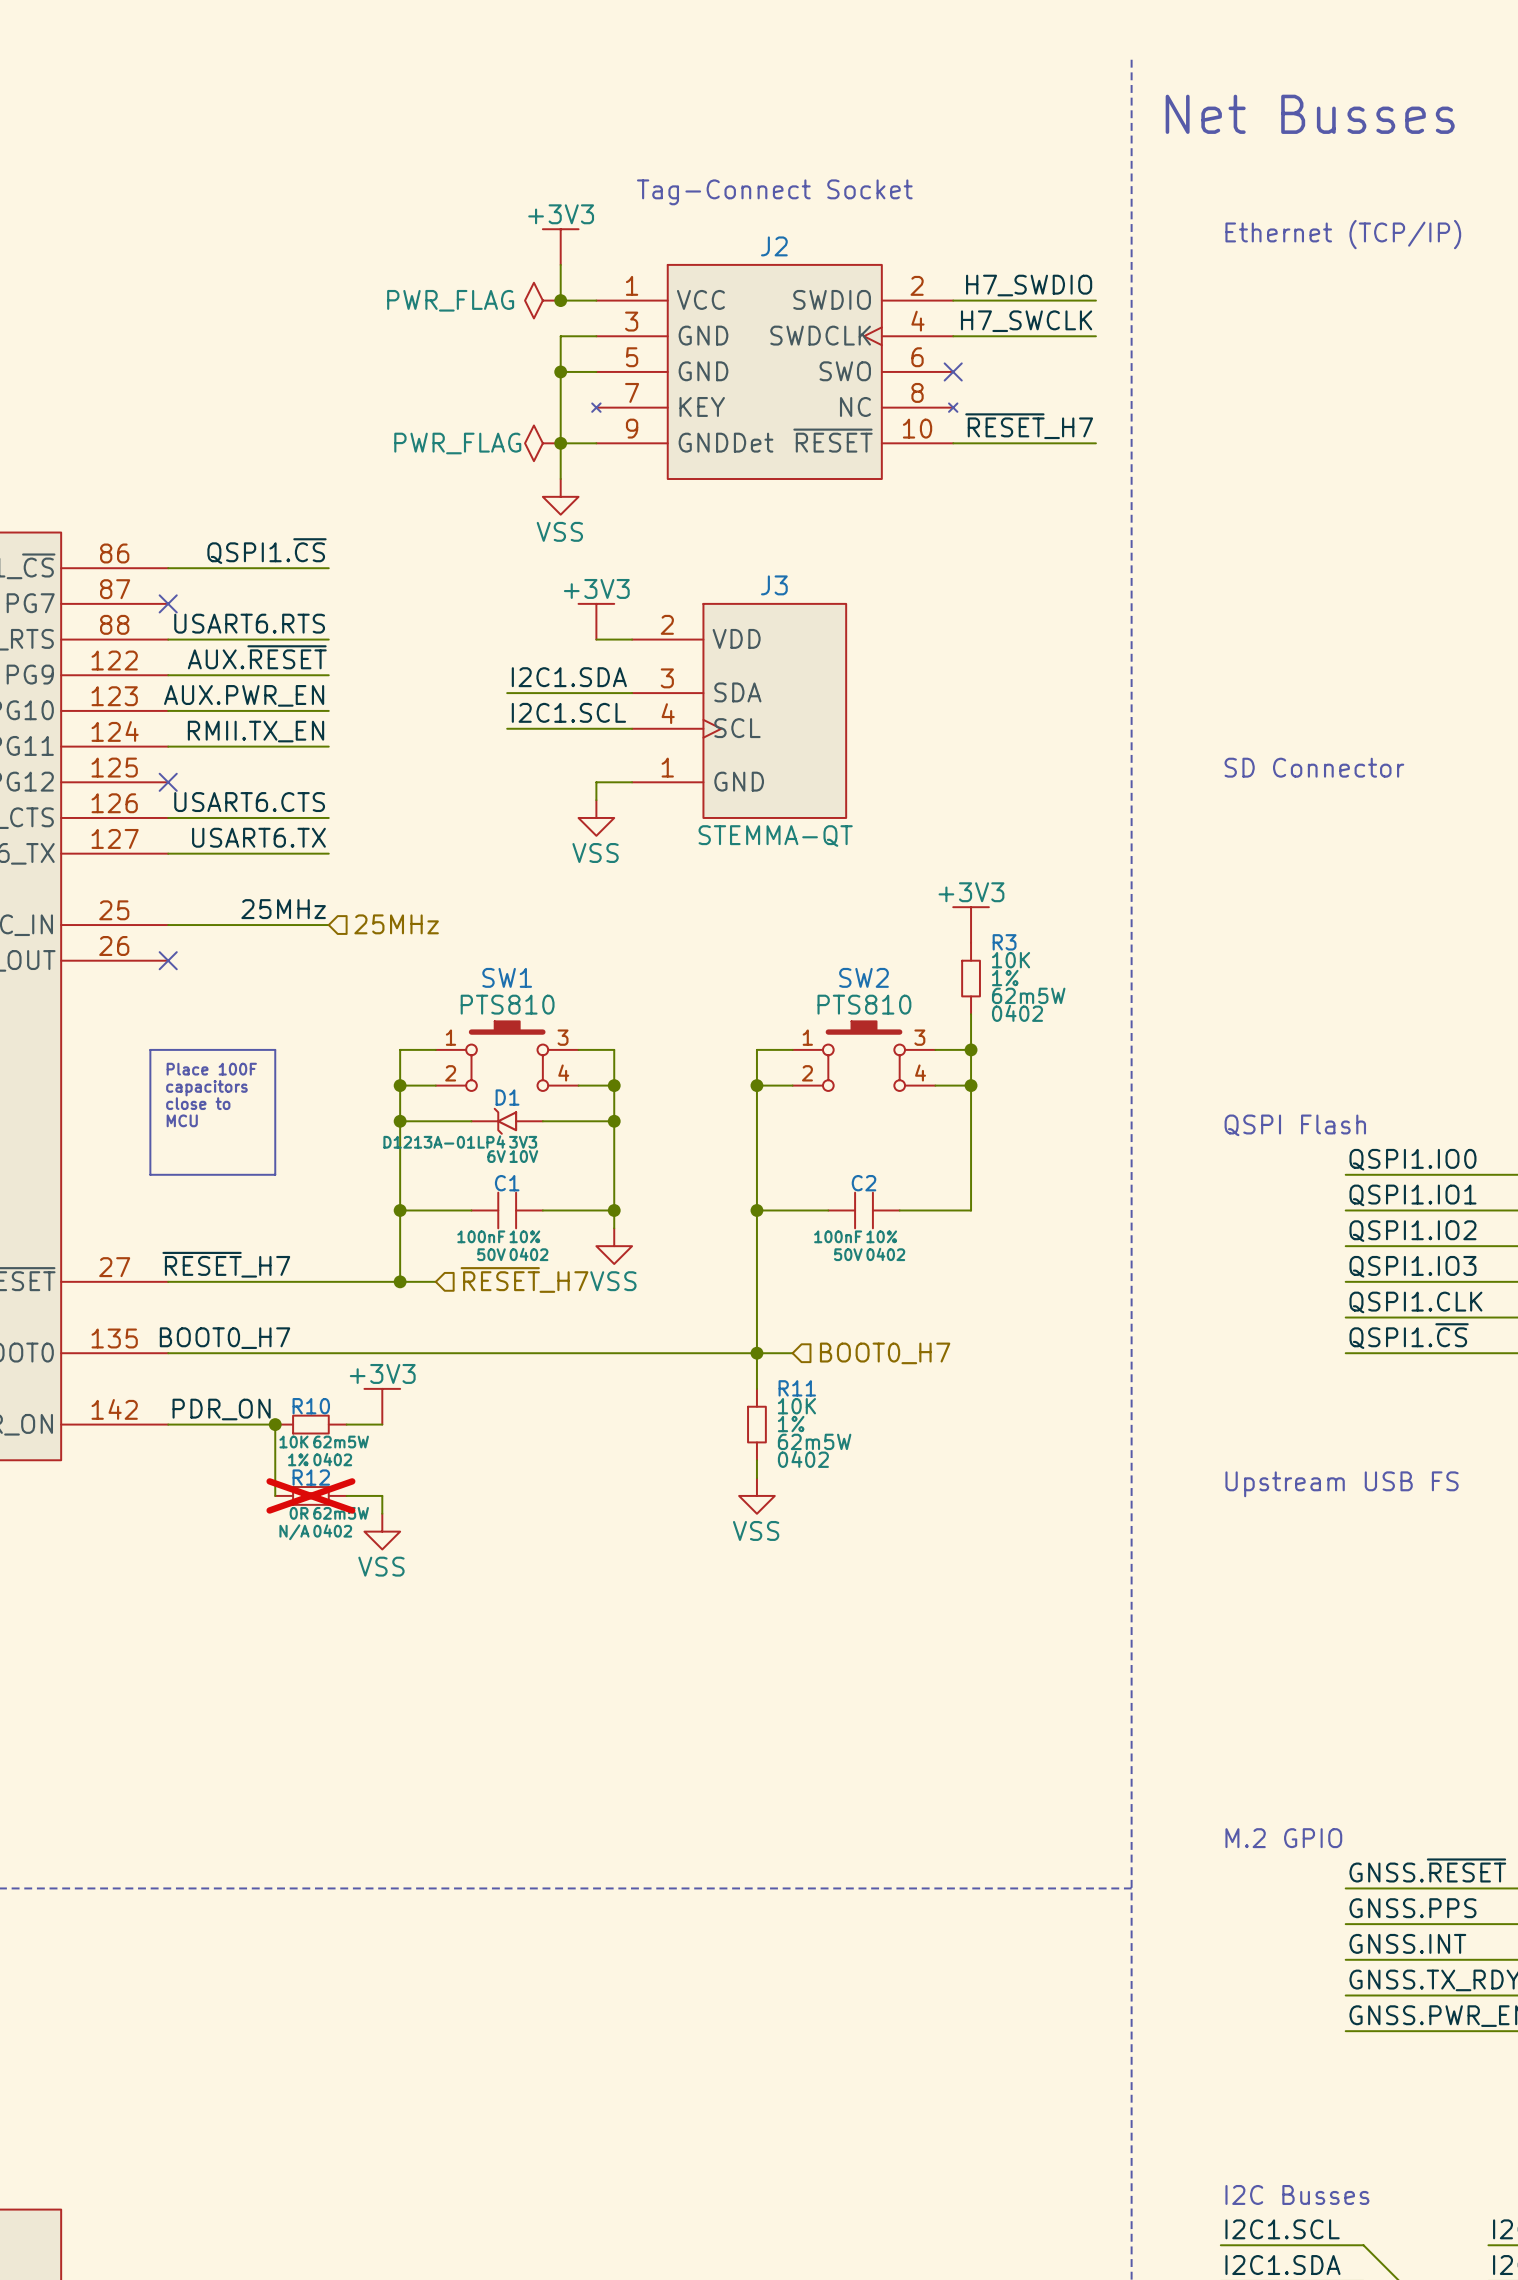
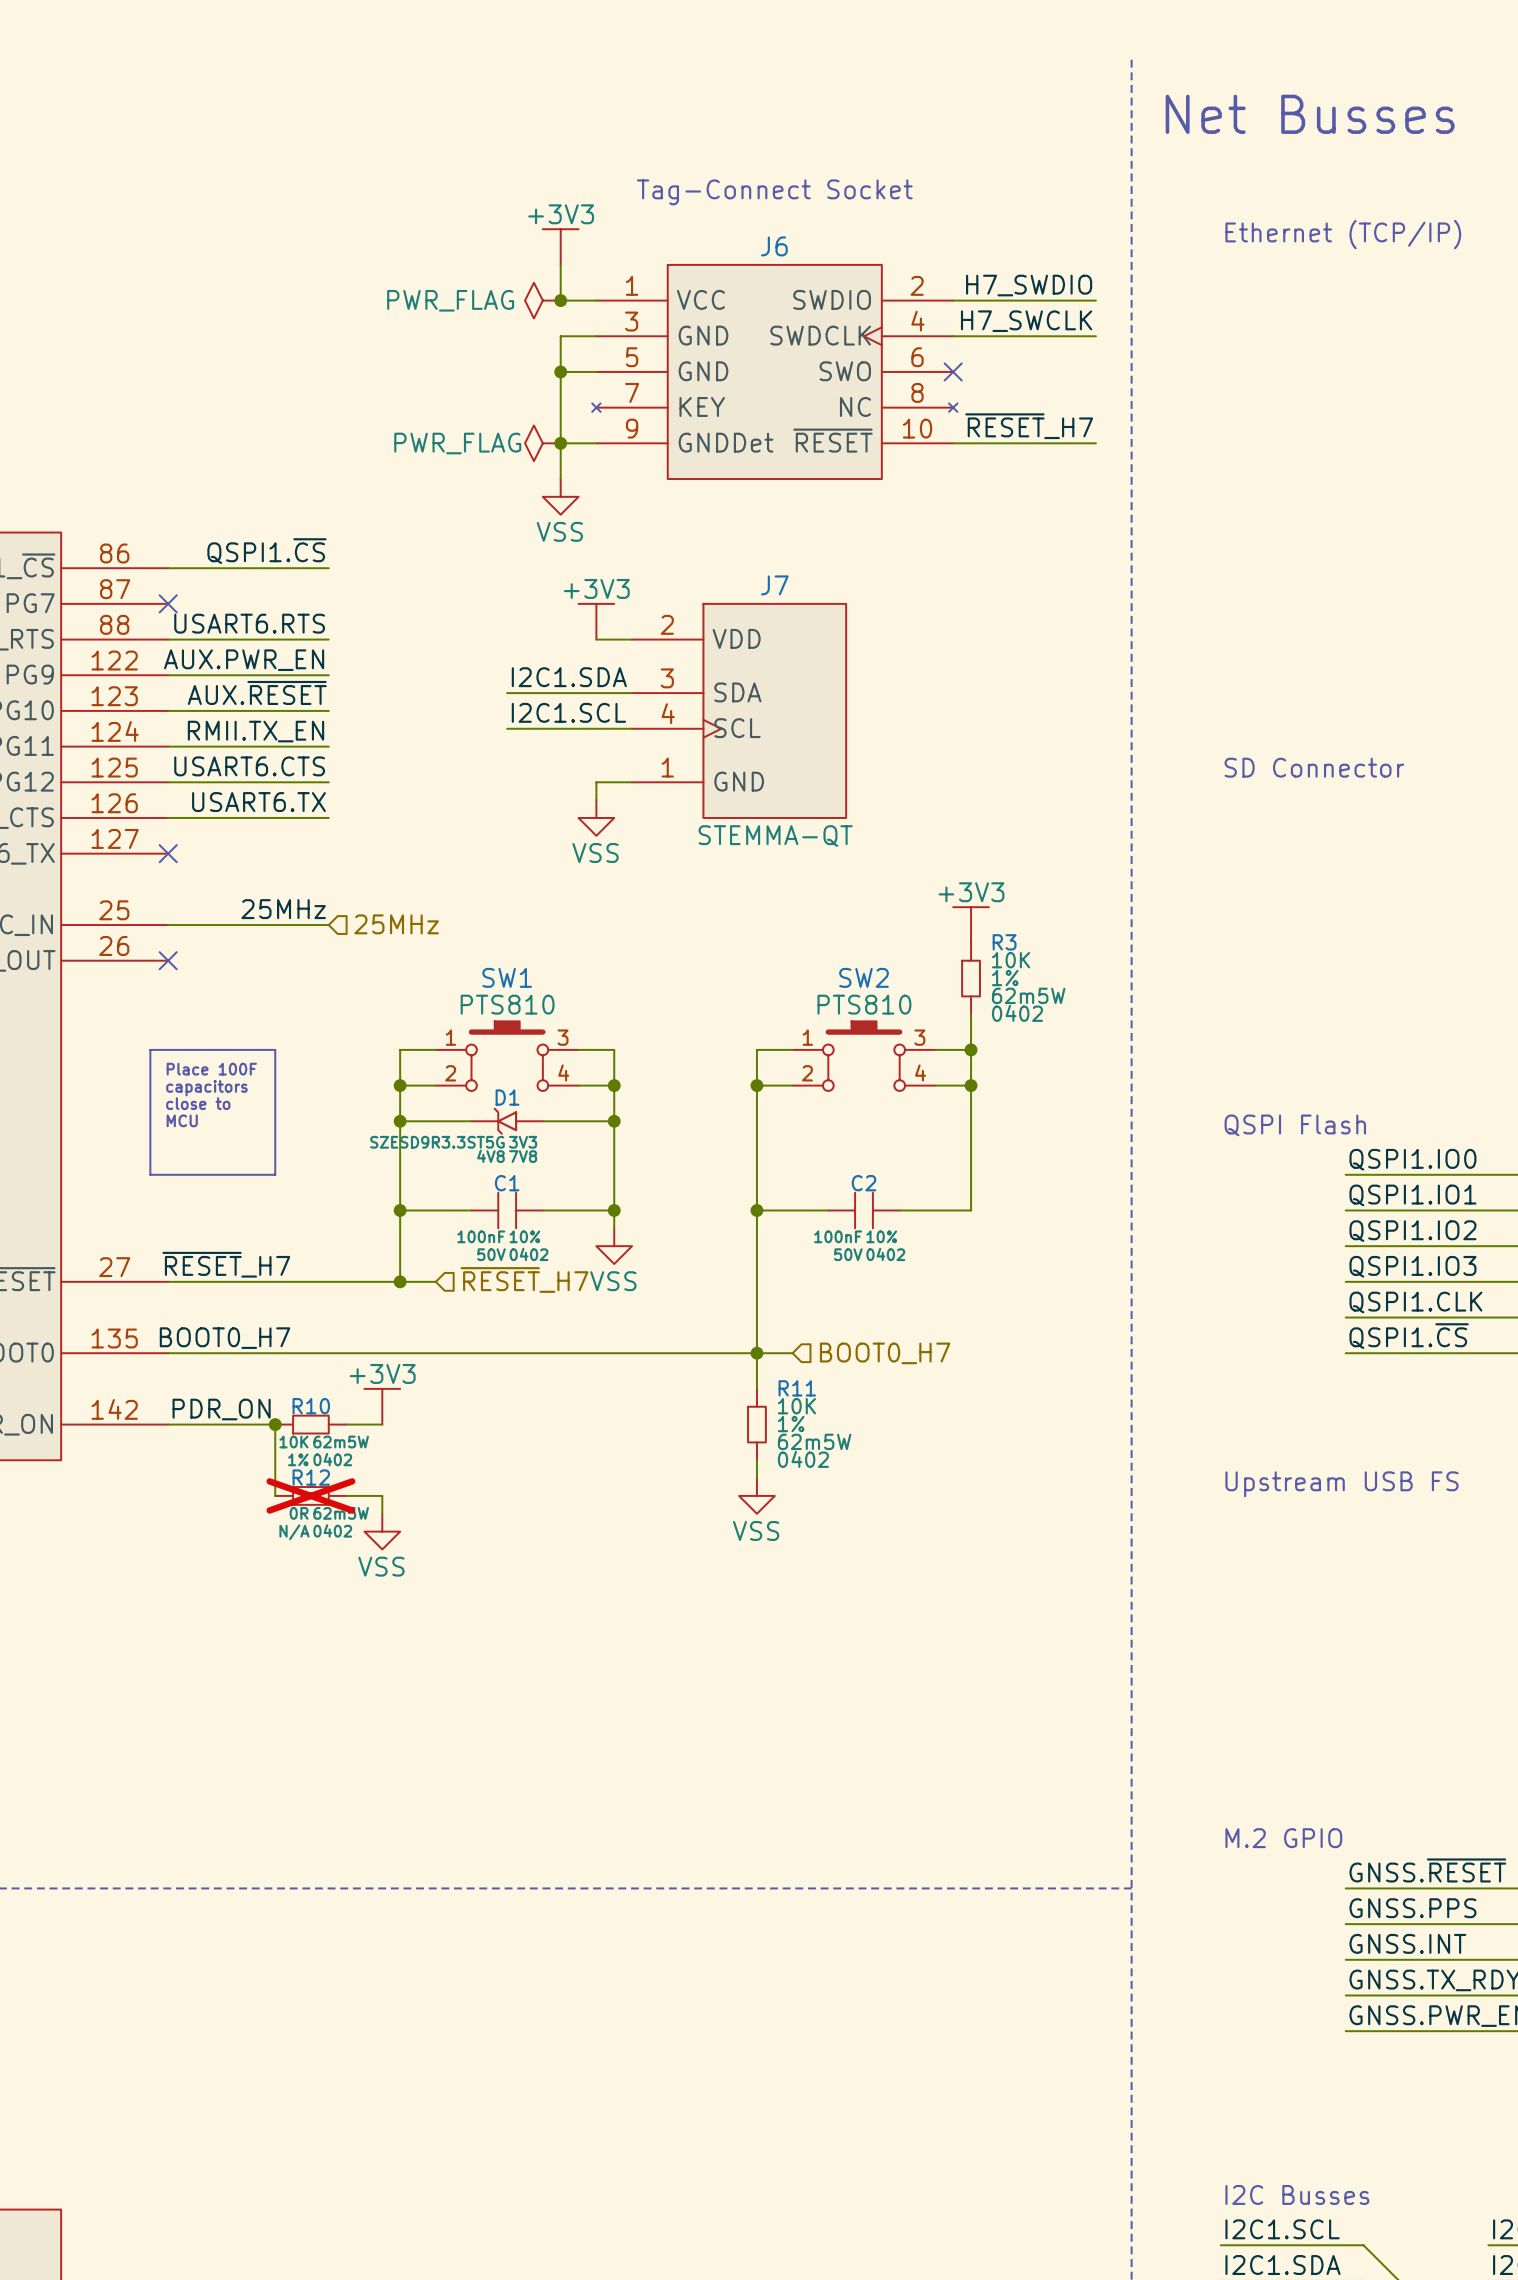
J2 name: J2 (774, 246) -> J6 (774, 246)
J3 name: J3 (774, 585) -> J7 (774, 585)
label: AUX.~{RESET} (257, 657) -> AUX.PWR_EN (244, 660)
label: AUX.PWR_EN (244, 695) -> AUX.~{RESET} (257, 692)
label: none -> USART6.CTS (249, 766)
no-connect mark position: (168, 782) -> (168, 853)
label: USART6.CTS (249, 802) -> USART6.TX (258, 802)
label: USART6.TX (258, 837) -> none
wire: (168, 853) (328, 853) -> (168, 782) (328, 782)
D1 value: D1213A-01LP4 (444, 1142) -> SZESD9R3.3ST5G (437, 1142)
D1 text: 6V (496, 1156) -> 4V8 (490, 1156)
D1 text: 10V (523, 1156) -> 7V8 (523, 1156)

